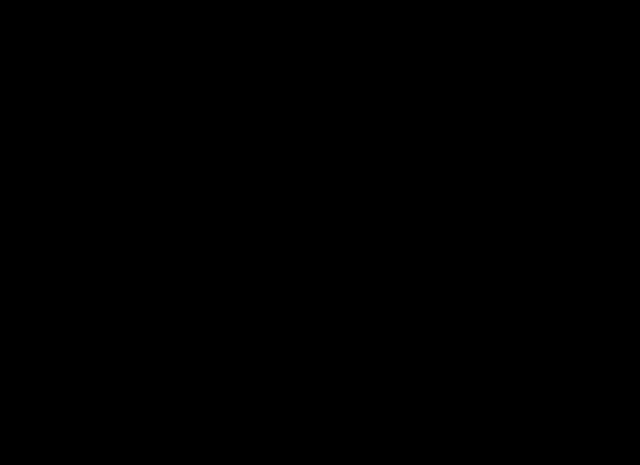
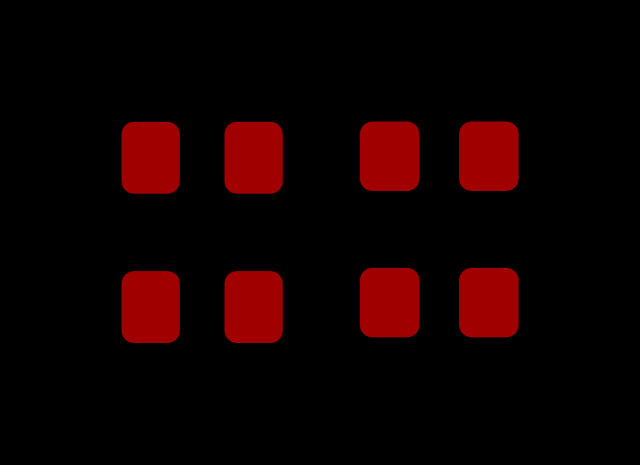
part: none -> (439, 156)
part: none -> (202, 157)
part: none -> (439, 302)
part: none -> (202, 307)

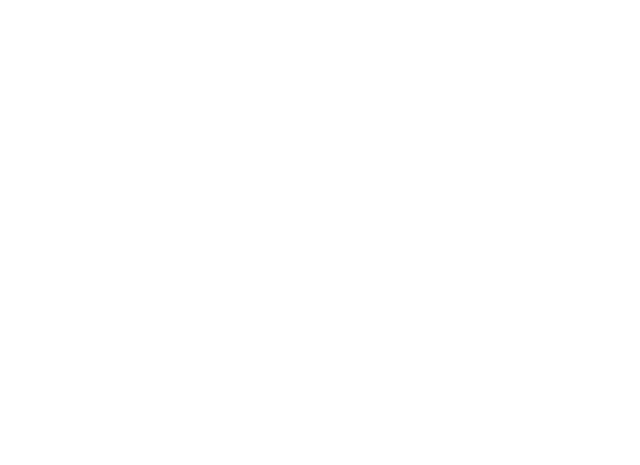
part: (439, 156) -> none
part: (202, 157) -> none
part: (439, 302) -> none
part: (202, 307) -> none

